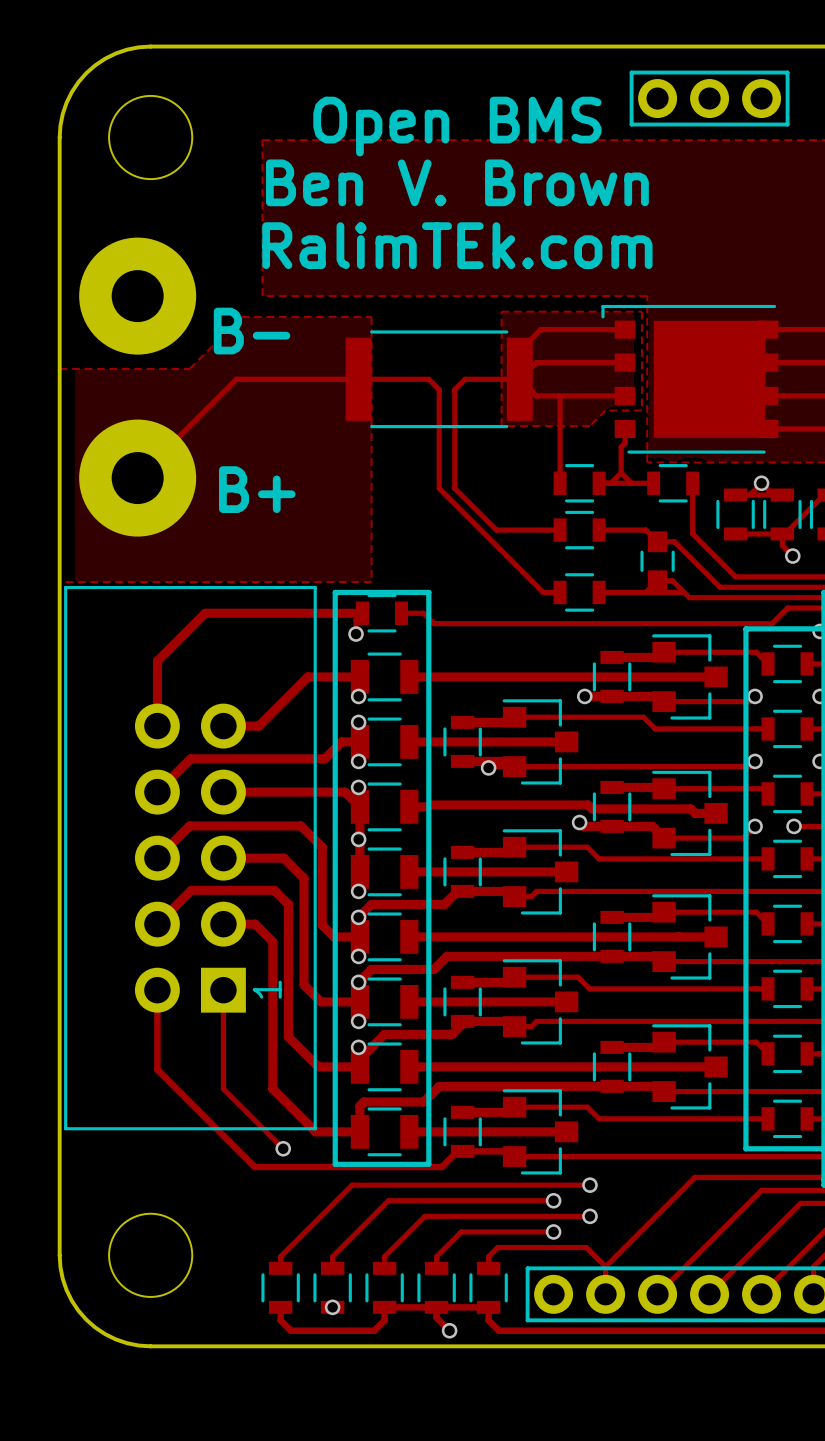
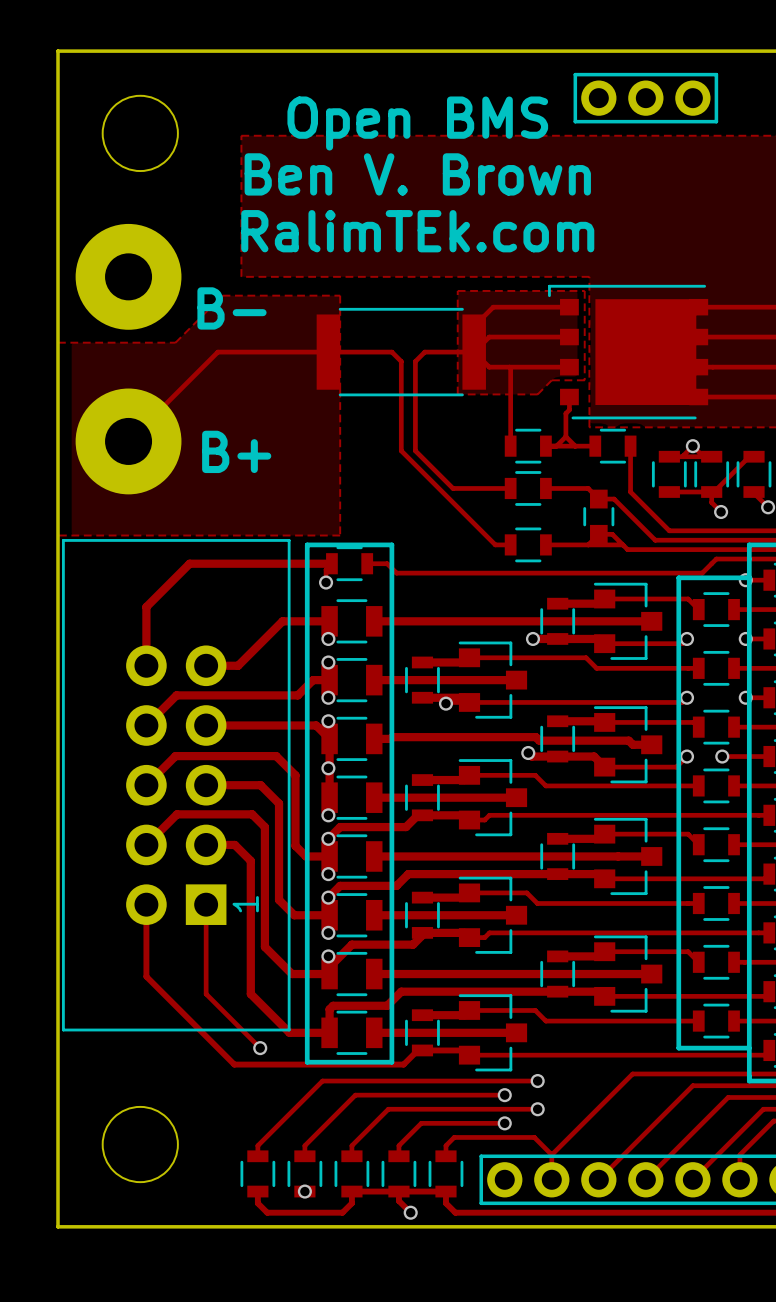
board edge: (150, 46) (127, 49) (115, 53) (105, 58) (86, 73) (78, 82) (66, 102) (62, 113) (59, 137) -> (140, 51) (58, 51) (58, 133)
board edge: (59, 1255) (62, 1278) (66, 1290) (78, 1310) (86, 1319) (105, 1334) (115, 1339) (127, 1343) (150, 1346) -> (58, 1144) (58, 1226) (140, 1226)

